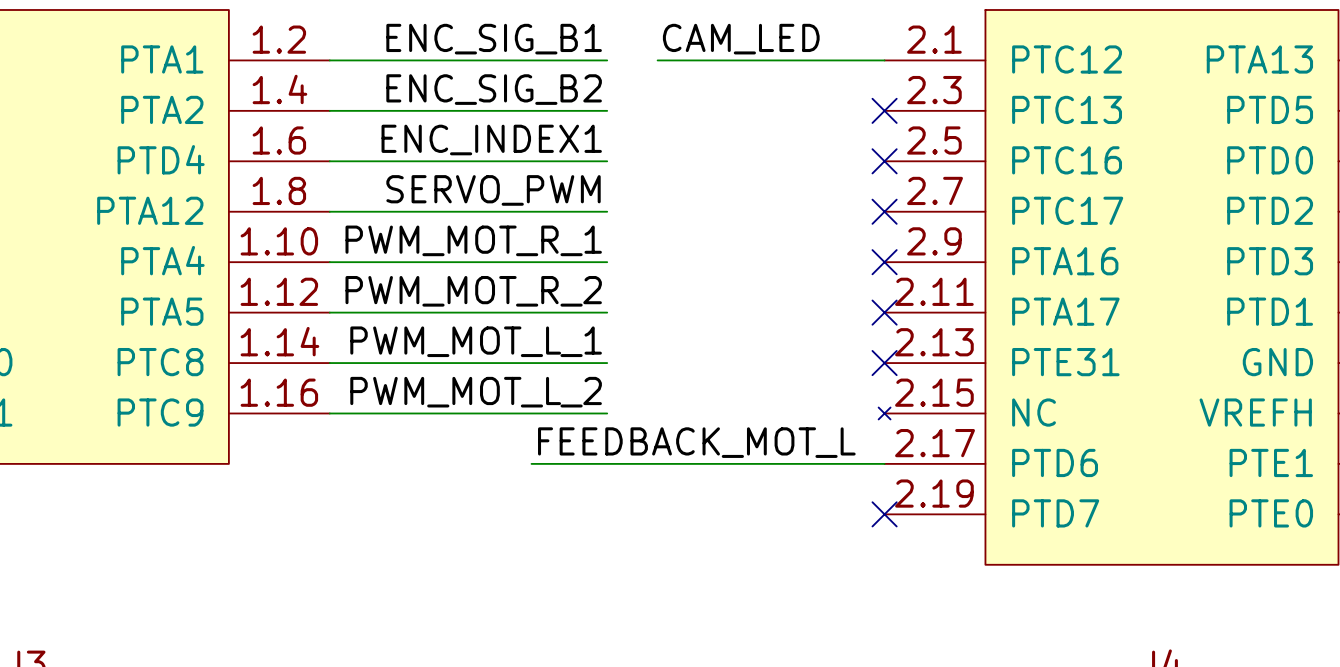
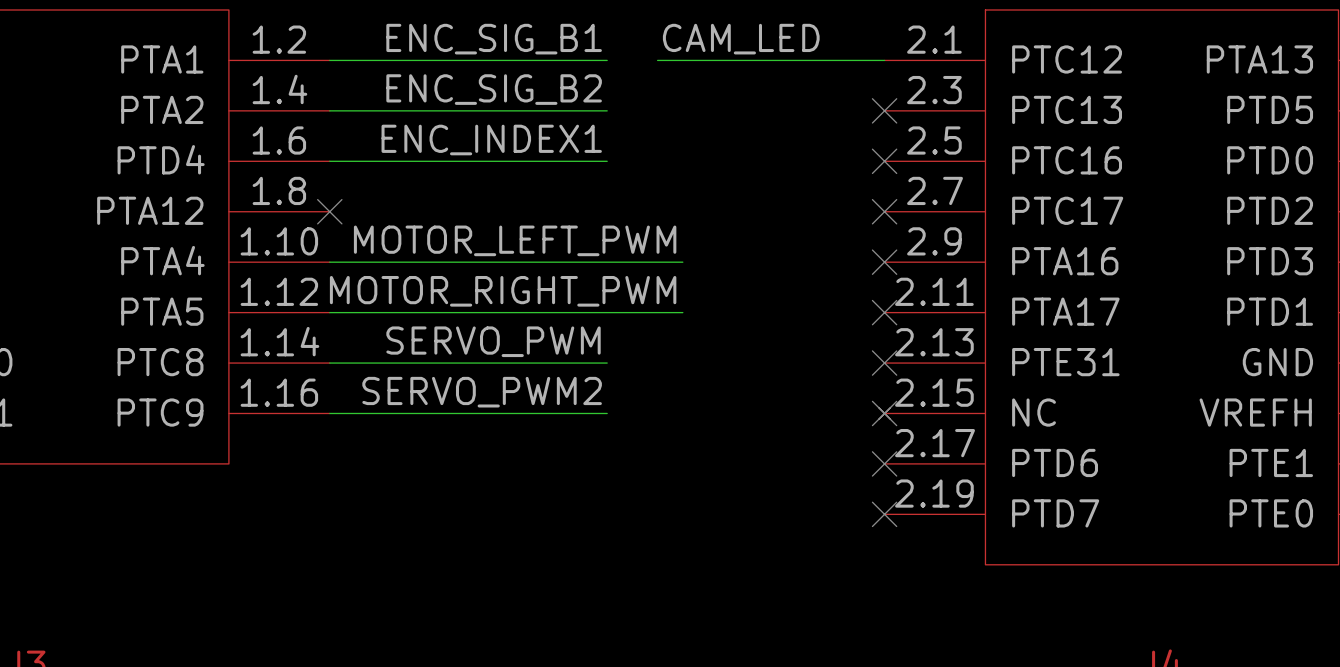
label: SERVO_PWM (493, 190) -> none
wire: (329, 211) (607, 211) -> none
no-connect mark: none -> (329, 211)
label: PWM_MOT_R_1 (473, 240) -> none
label: none -> MOTOR_LEFT_PWM (515, 240)
wire: none -> (607, 262) (682, 262)
label: PWM_MOT_R_2 (473, 291) -> none
label: none -> MOTOR_RIGHT_PWM (503, 291)
wire: none -> (607, 312) (682, 312)
label: PWM_MOT_L_1 (476, 341) -> SERVO_PWM (493, 341)
label: PWM_MOT_L_2 (476, 392) -> SERVO_PWM2 (482, 392)
no-connect mark: none -> (884, 413)
label: FEEDBACK_MOT_L (696, 442) -> none
wire: (531, 463) (884, 463) -> none
no-connect mark: none -> (884, 463)

